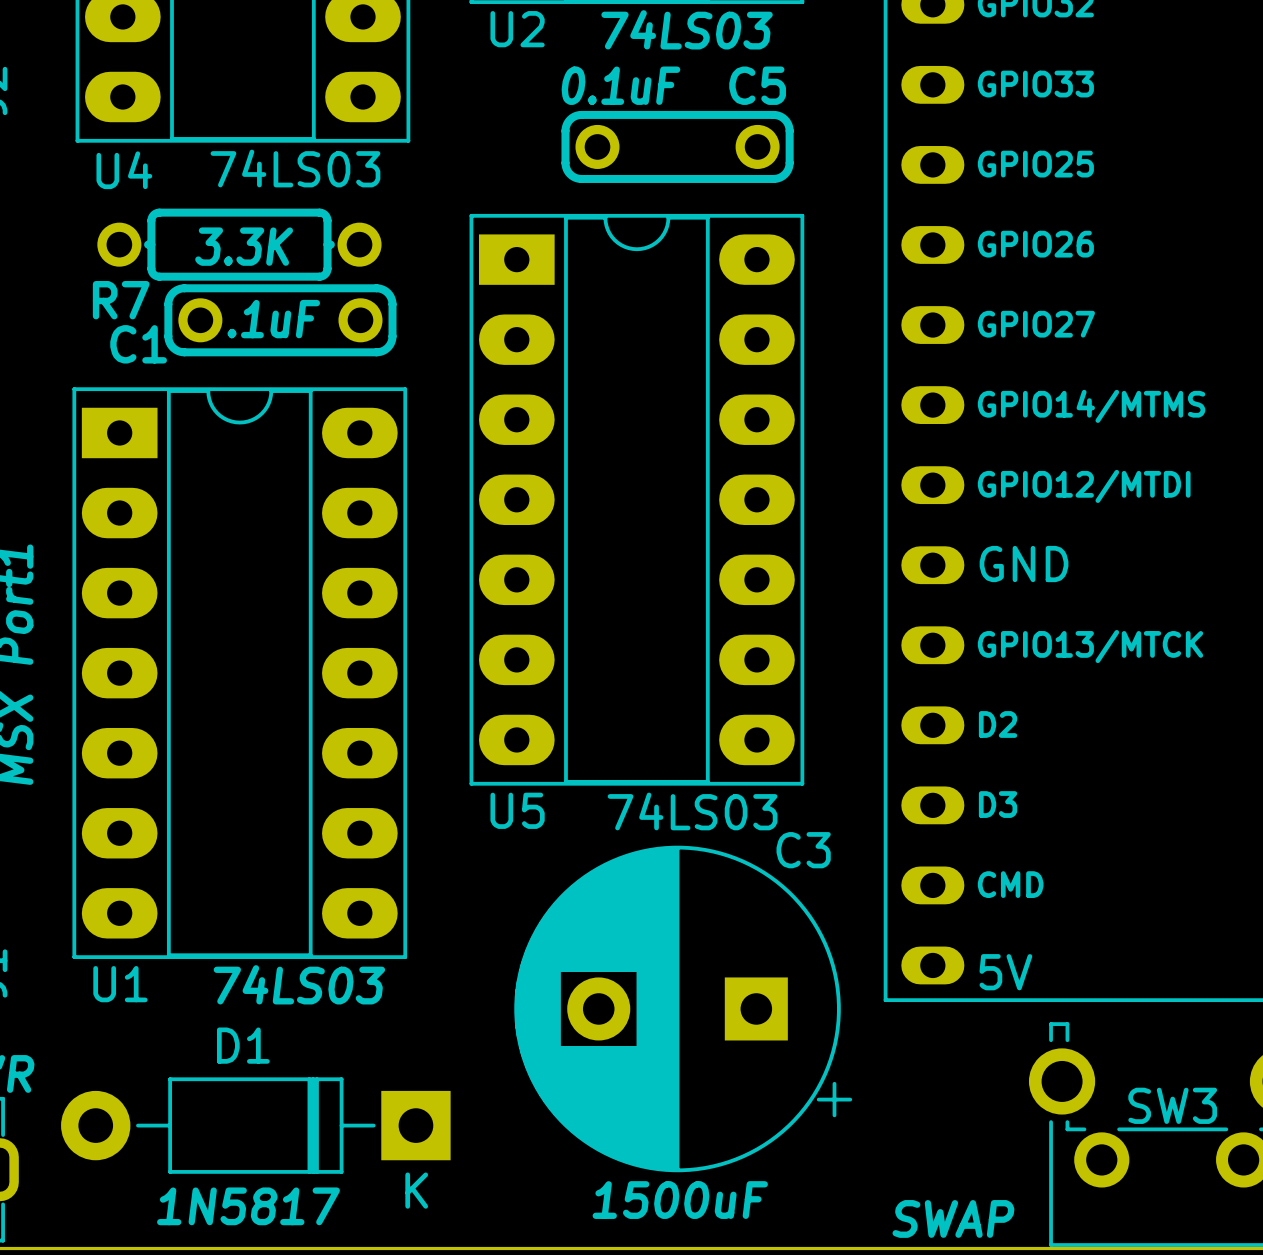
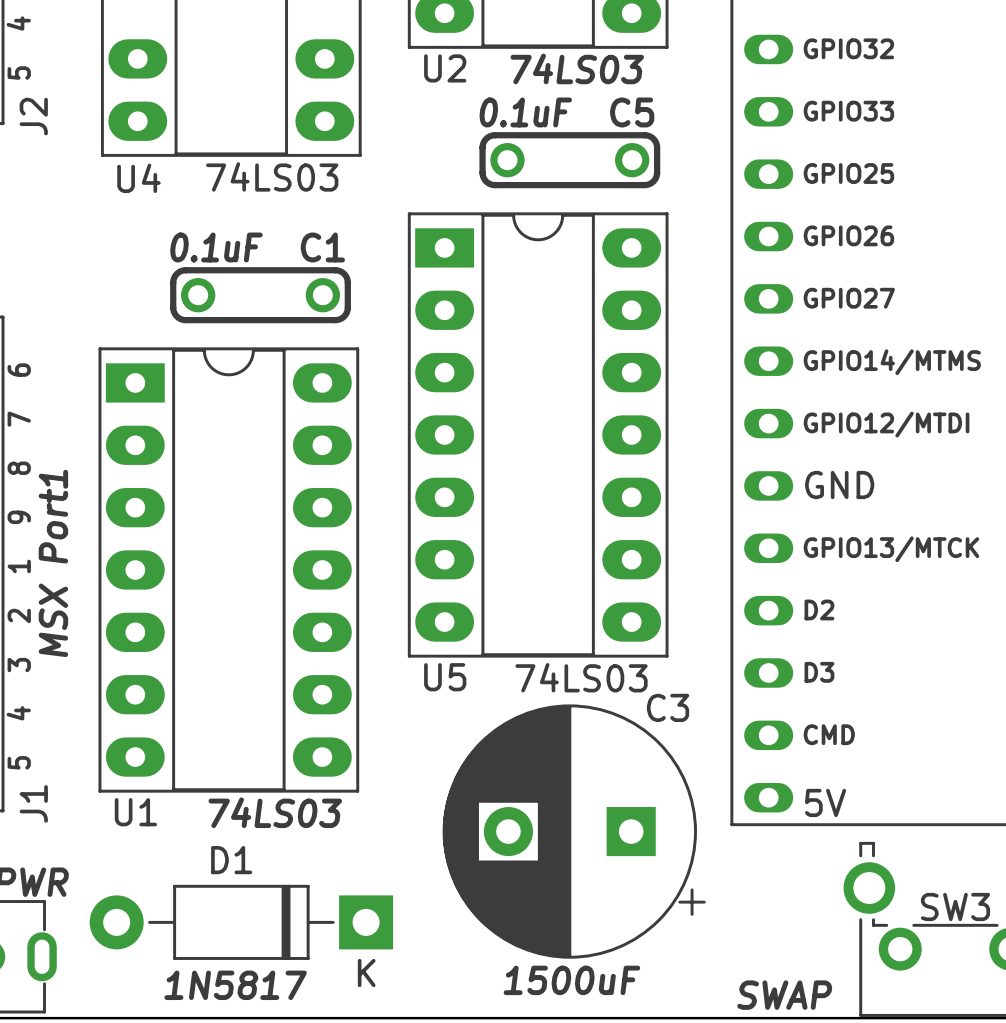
R7: 3.3K (239, 244) -> none
C1 value: .1uF (273, 319) -> 0.1uF (216, 247)
C1 name position: C1 (138, 344) -> C1 (322, 247)

